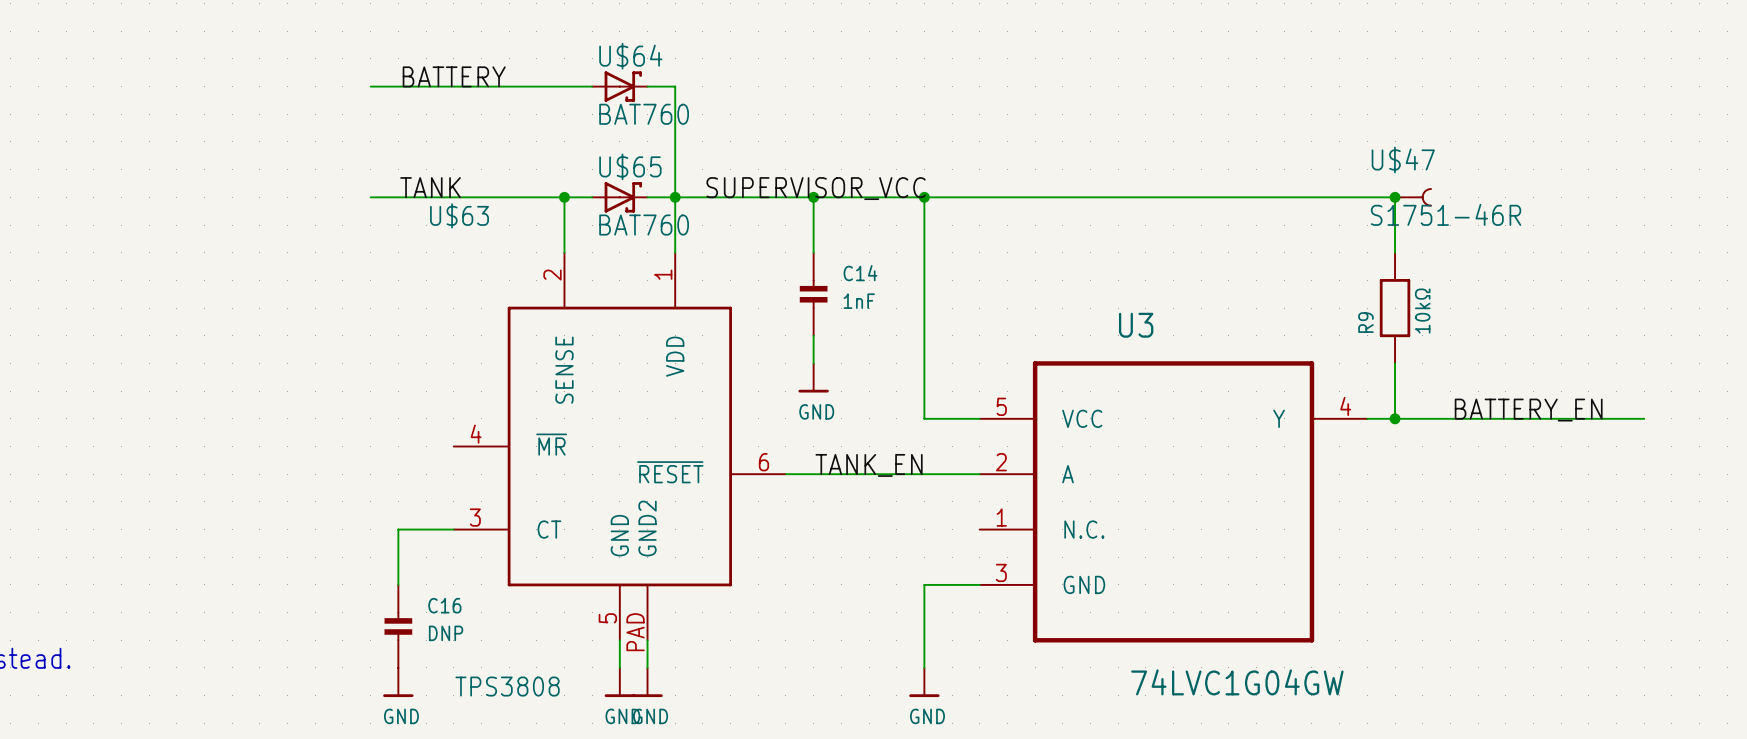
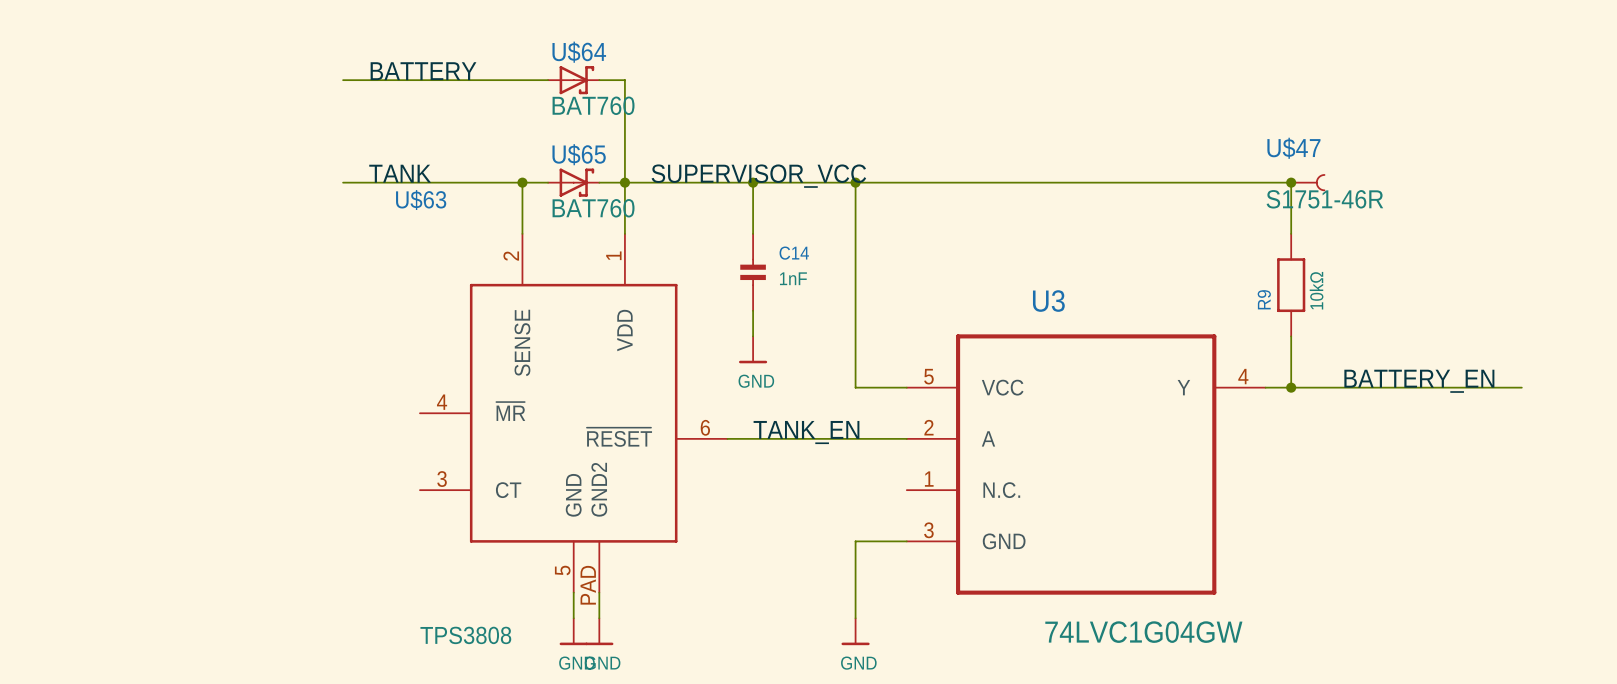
wire: (453, 529) (398, 529) (398, 584) -> none
C16: DNP (398, 626) -> none
power symbol: GND (398, 682) -> none

